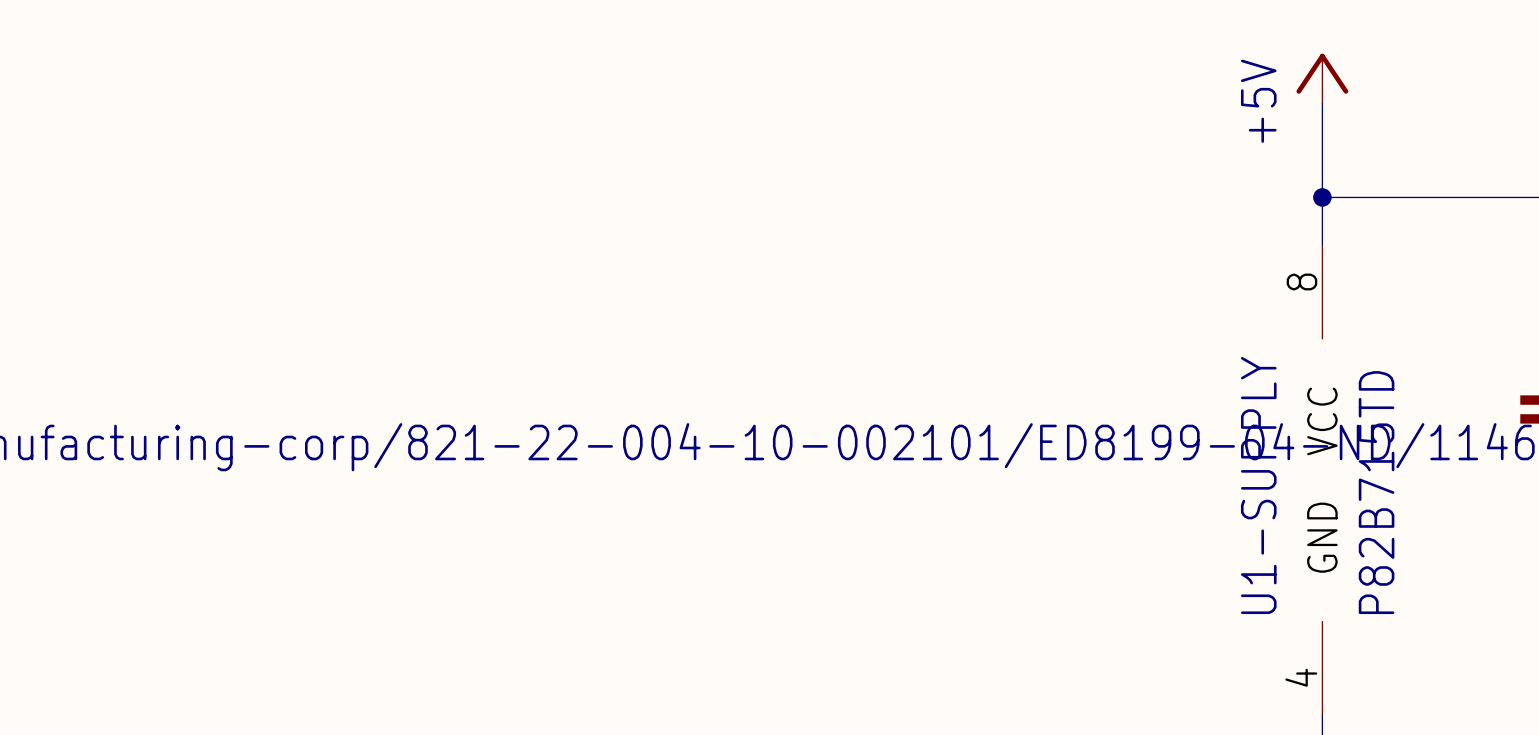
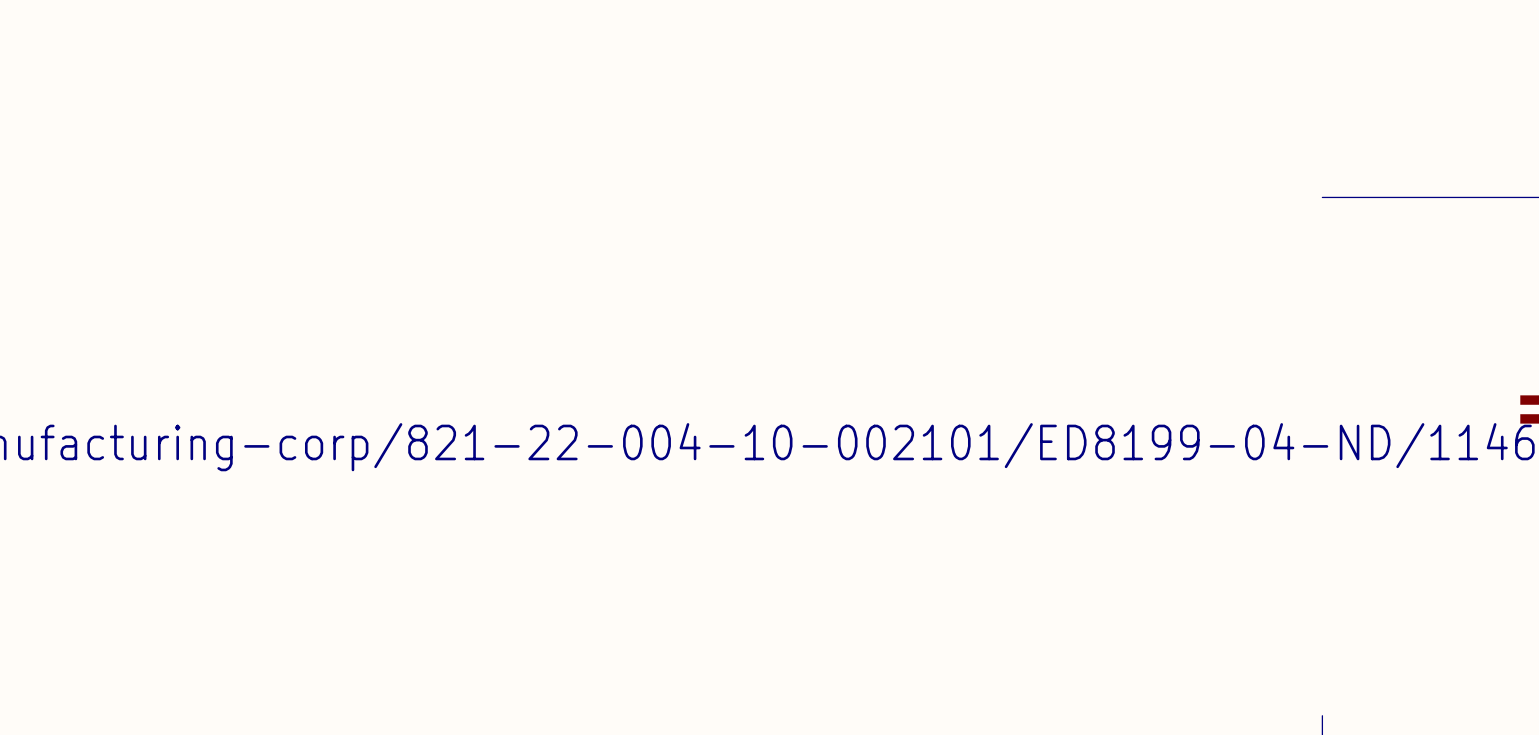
power symbol: +5V (1322, 78) -> none
wire: (1322, 103) (1322, 244) -> none
junction: (1322, 197) -> none
U1-SUPPLY: P82B715TD (1322, 480) -> none

